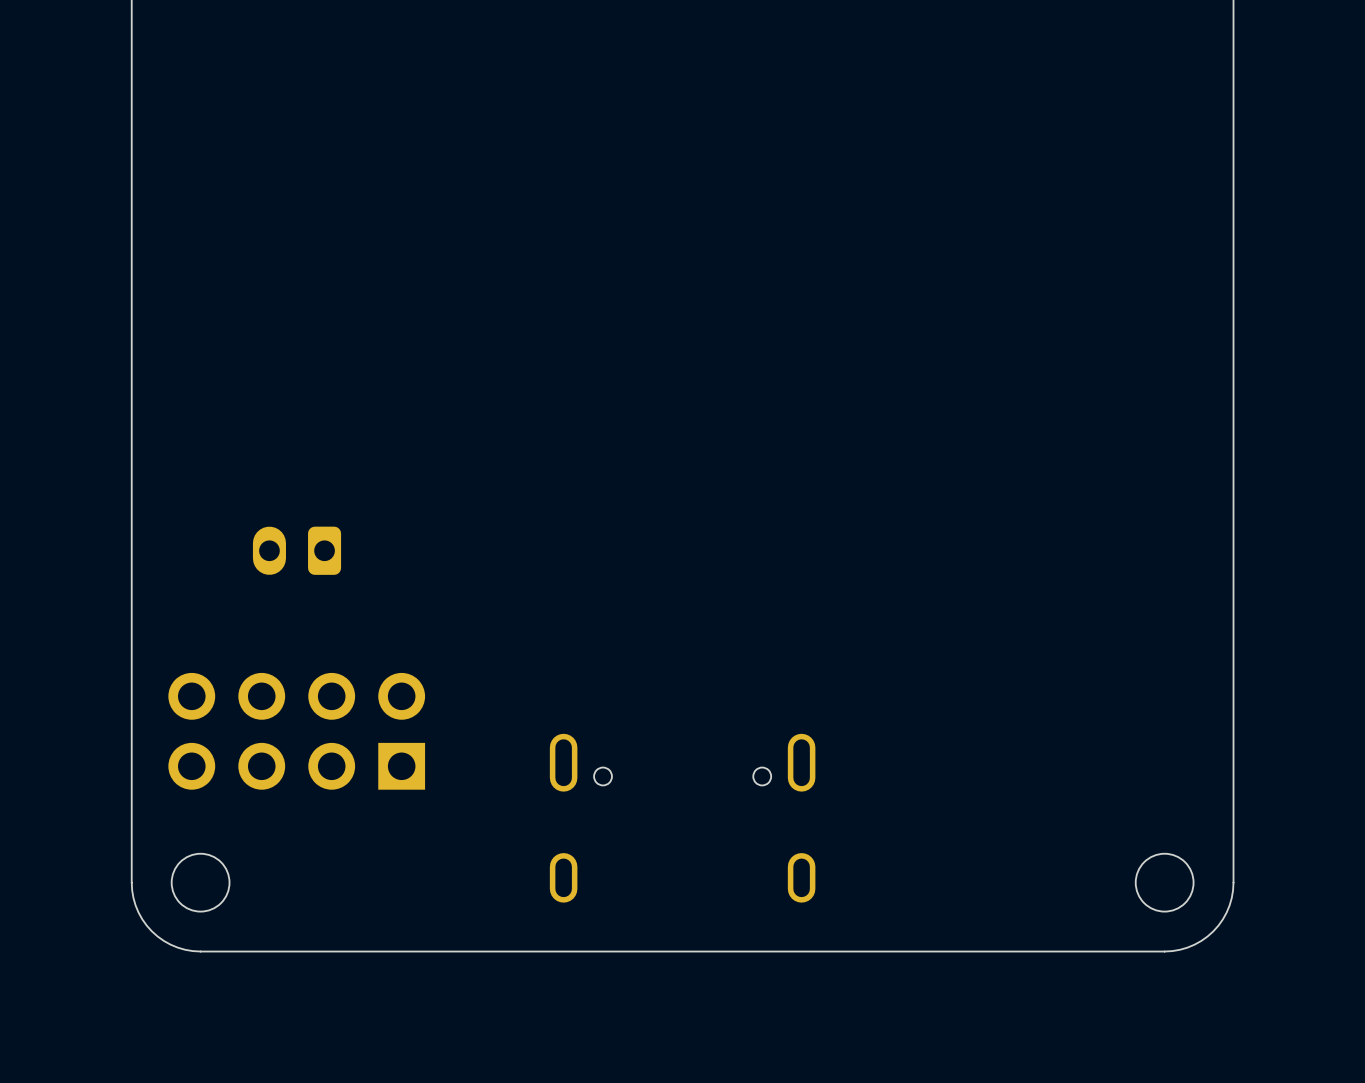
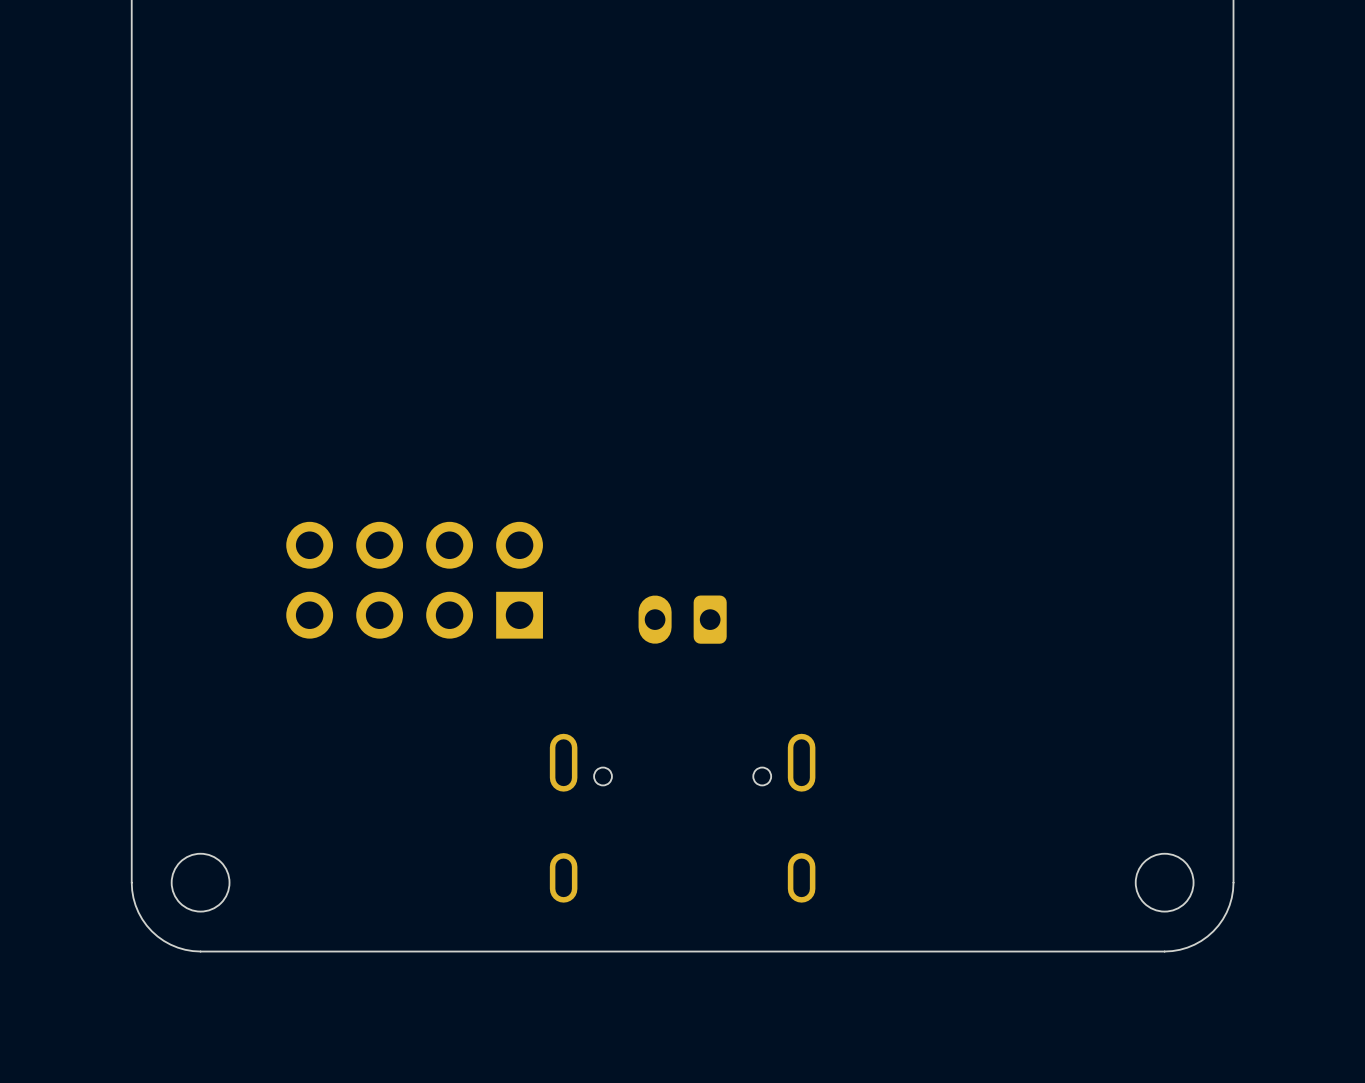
part position: (297, 550) -> (682, 619)
part position: (296, 731) -> (414, 580)

